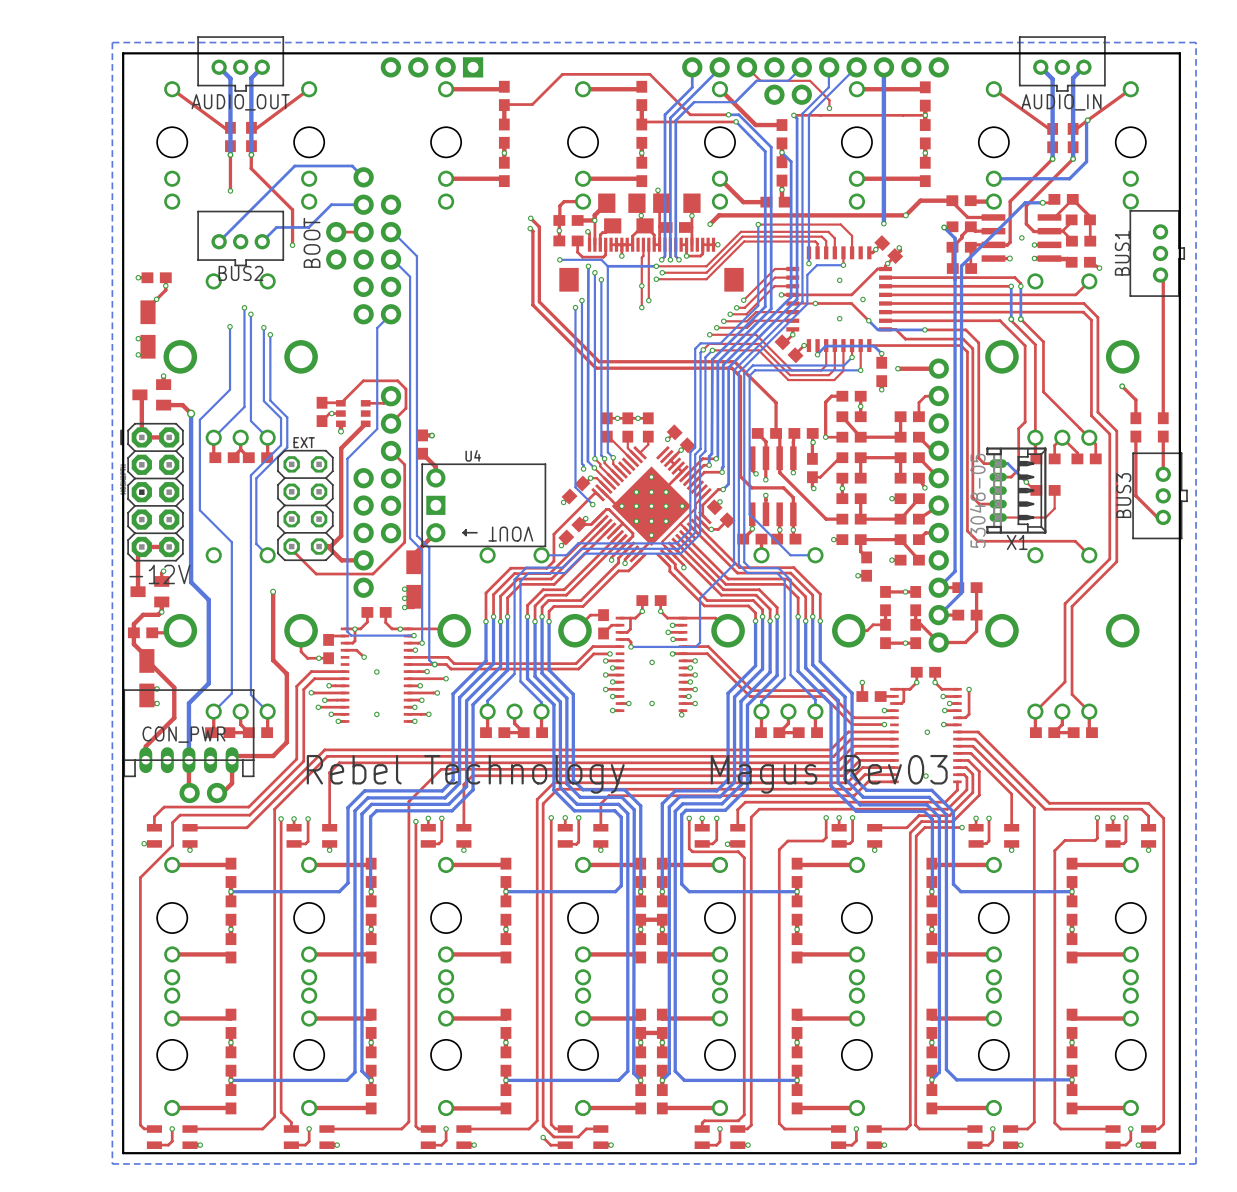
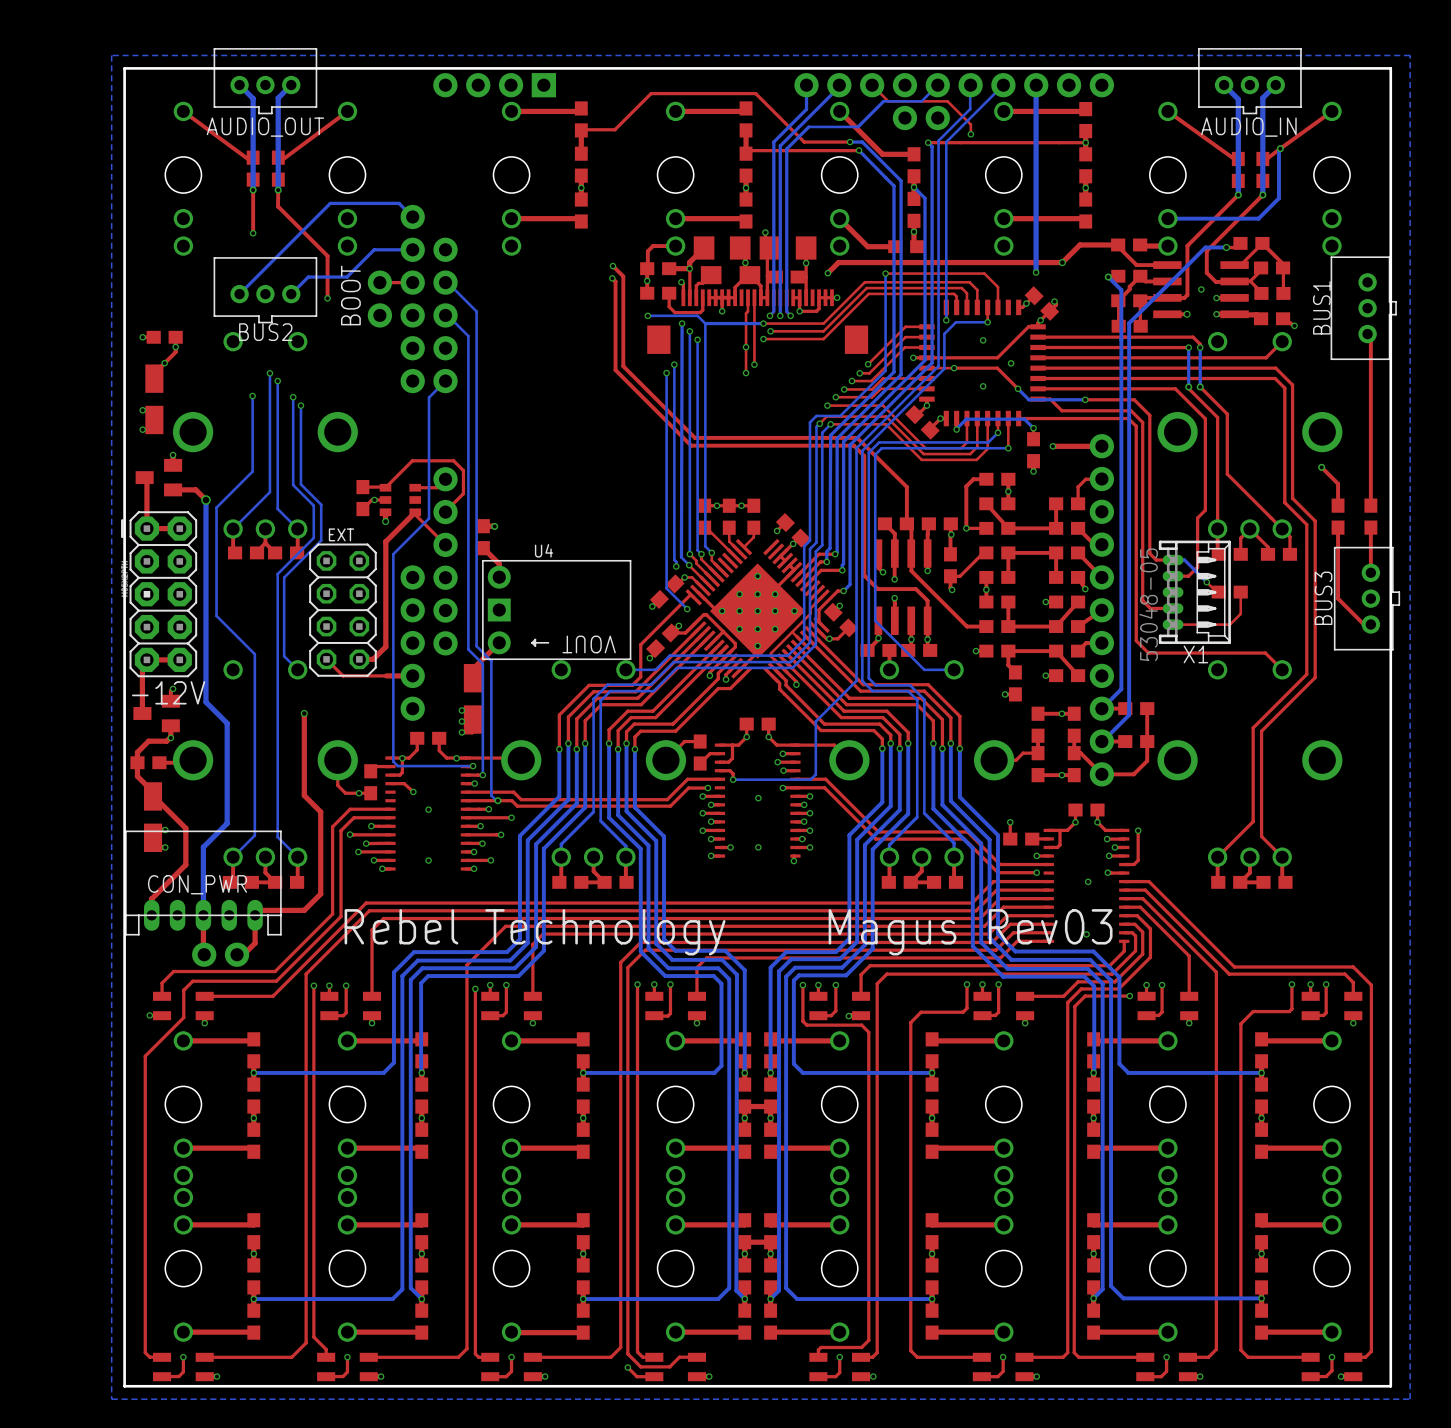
top track: (391, 451) (404, 464) (404, 542) (372, 574) (316, 574) (291, 549) (291, 546) -> (445, 544) (415, 514) (415, 512)
top track: (327, 546) (341, 560) -> (326, 659) (343, 675) (386, 675)

